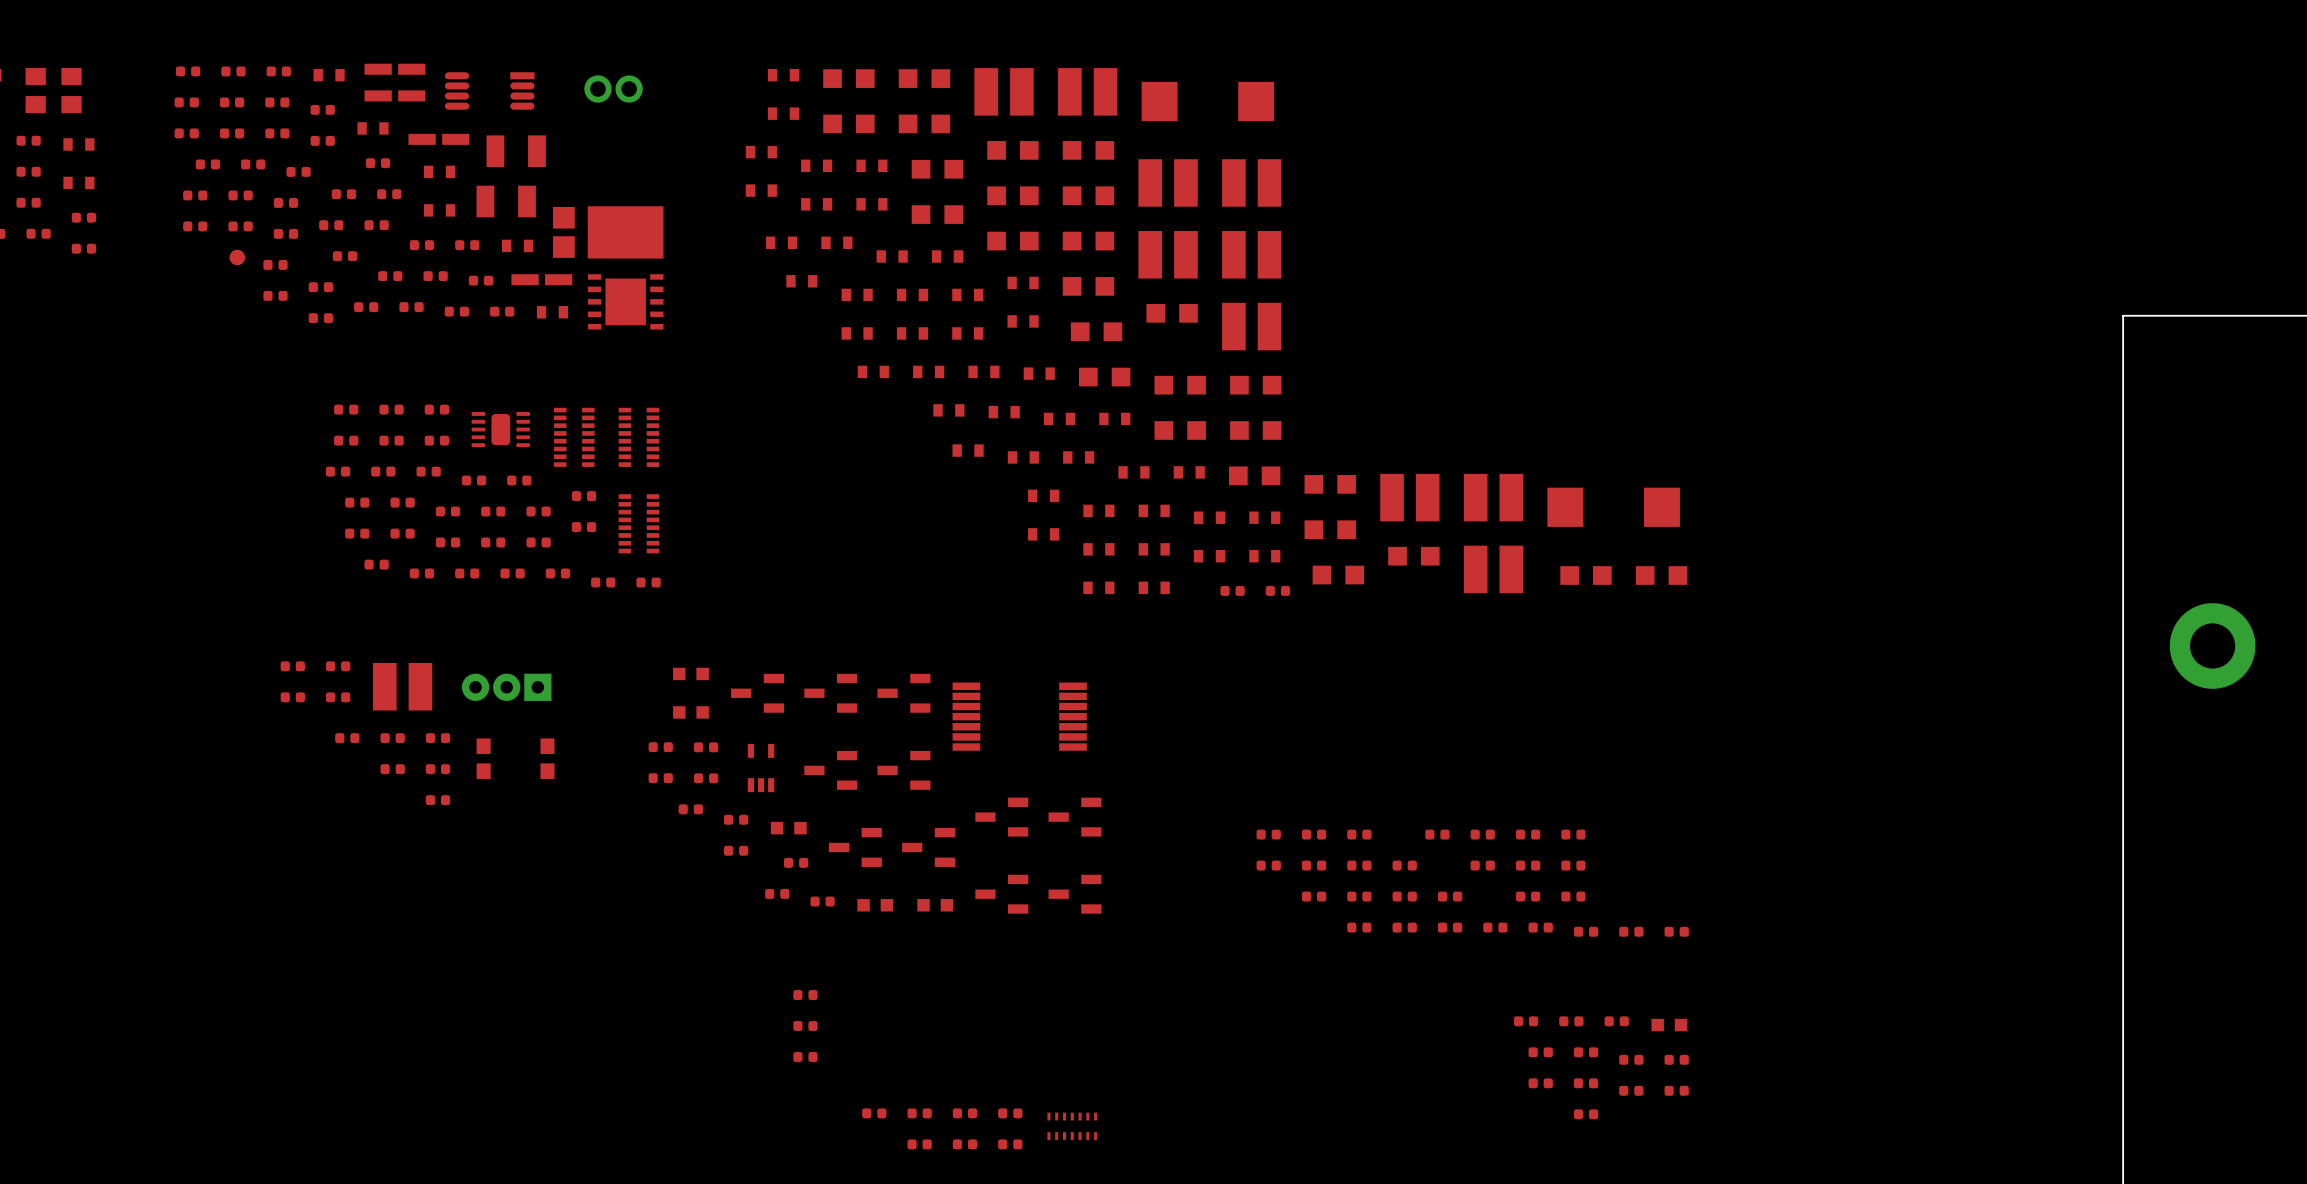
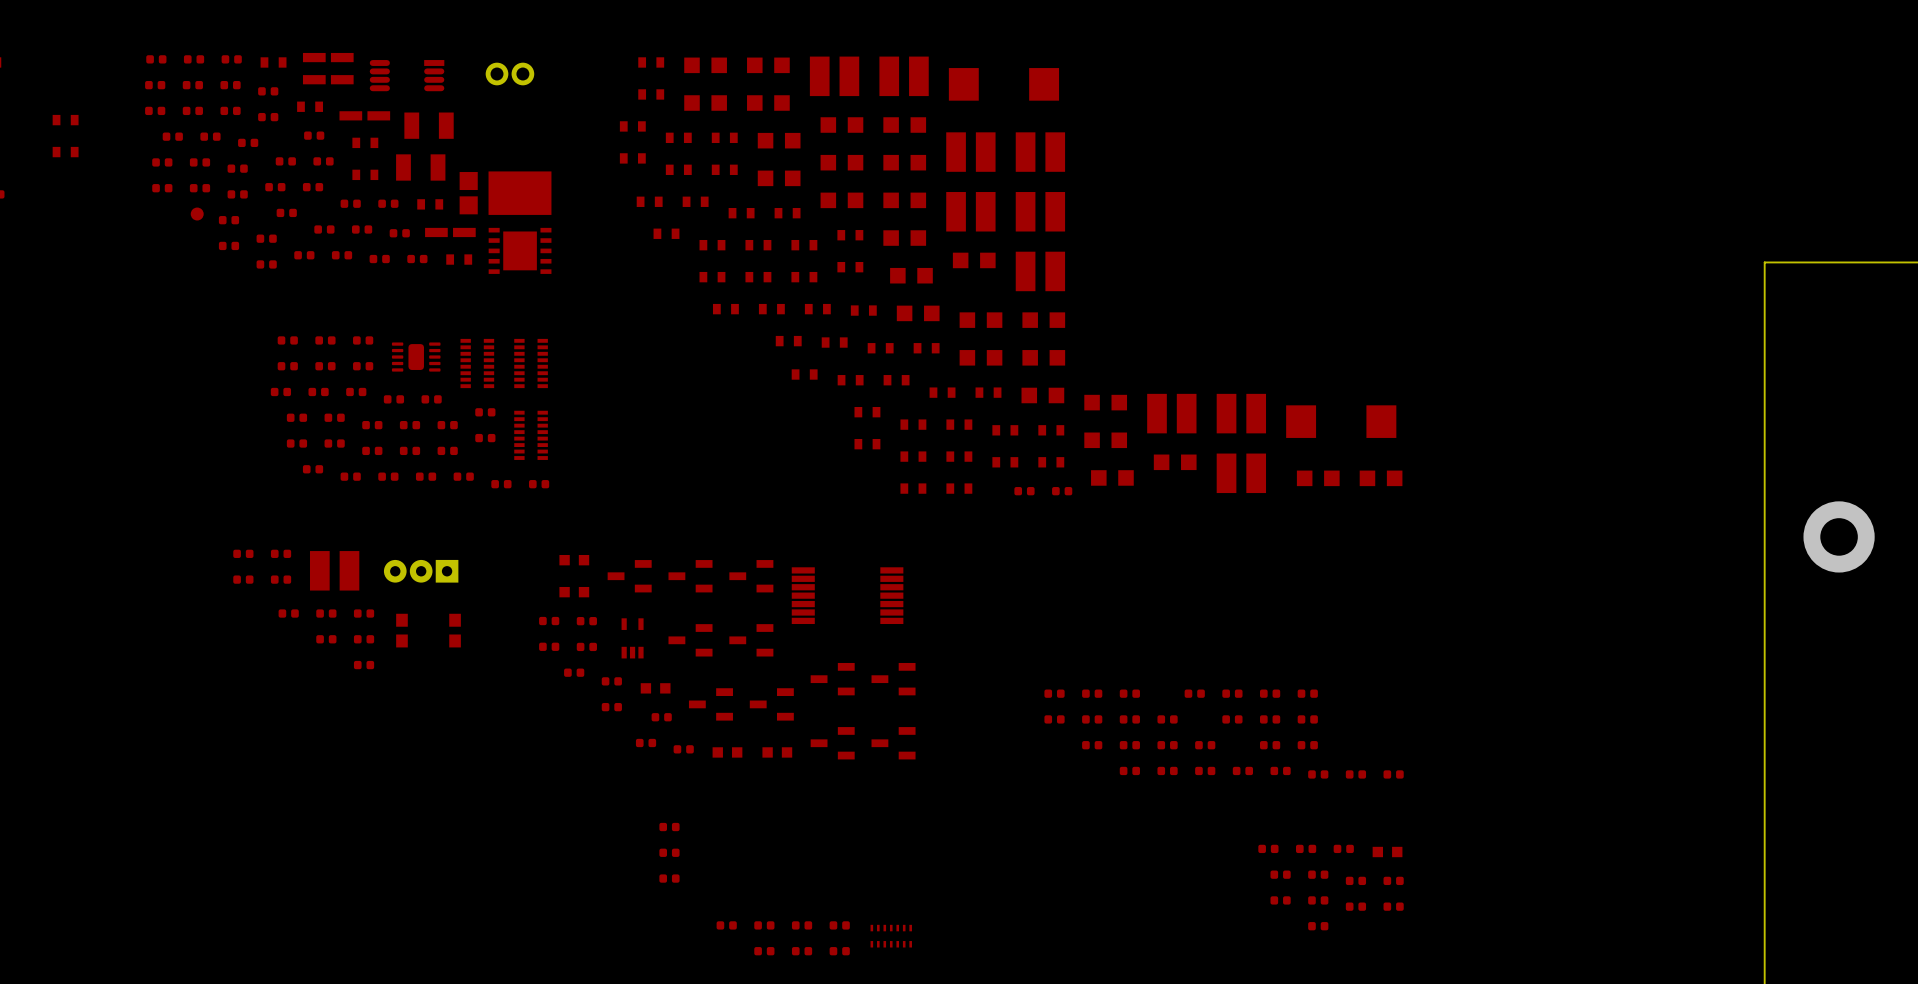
part: (53, 90) -> none
part: (28, 140) -> none
part: (28, 171) -> none
part: (28, 202) -> none
part: (83, 217) -> none
part: (38, 233) -> none
part: (83, 248) -> none

